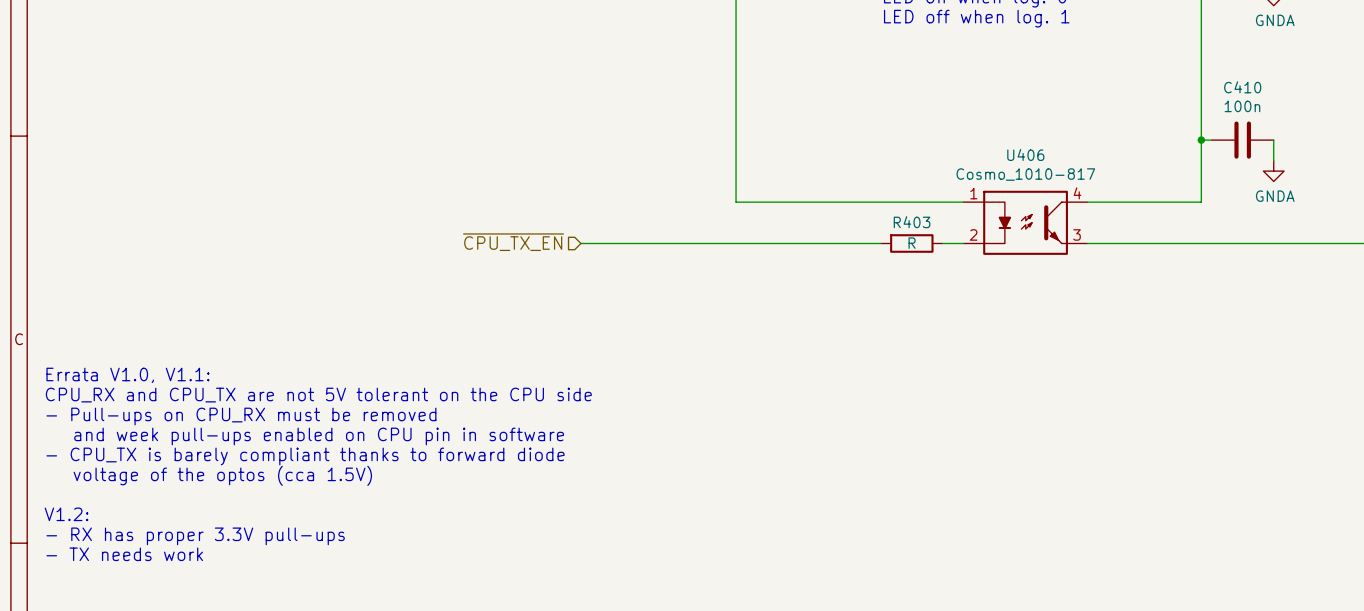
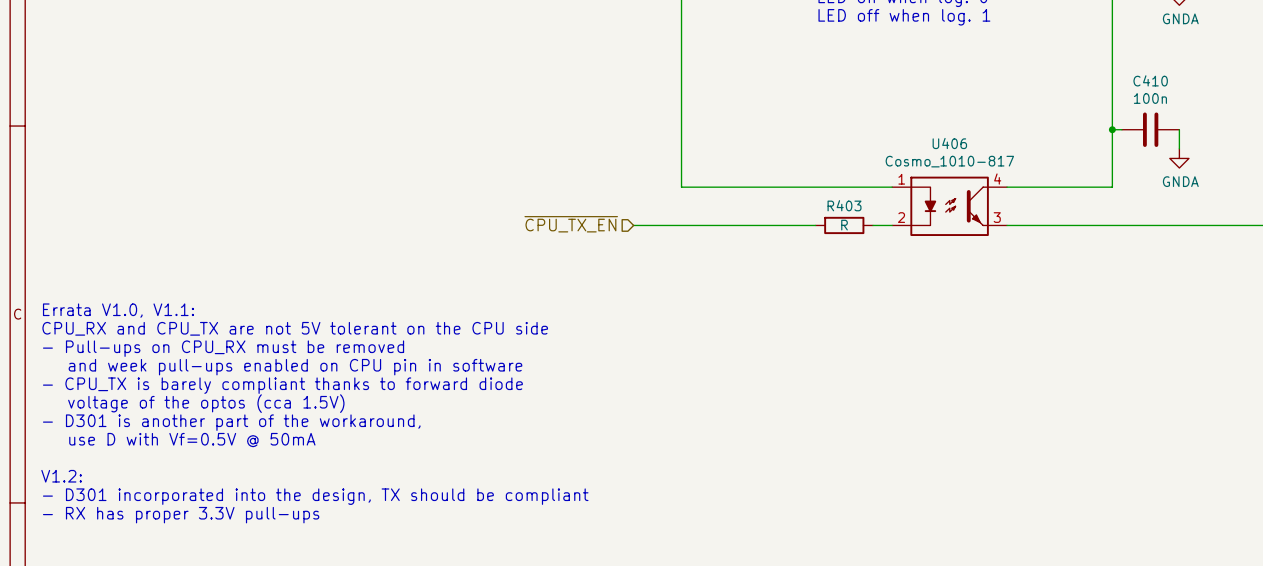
hierarchical label position: ~{CPU_TX_EN} (513, 242) -> ~{CPU_TX_EN} (571, 224)
wire: (580, 243) (684, 243) -> none
text: none -> Errata V1.0, V1.1: (118, 310)
text: none -> CPU_RX and CPU_TX are not 5V tolerant on the CPU side (295, 328)
text: Errata V1.0, V1.1: (127, 375) -> - Pull-ups on CPU_RX must be removed (223, 348)
text: CPU_RX and CPU_TX are not 5V tolerant on the CPU side (318, 395) -> and week pull-ups enabled on CPU pin in software (295, 367)
text: - Pull-ups on CPU_RX must be removed (241, 416) -> - CPU_TX is barely compliant thanks to forward diode (282, 385)
text: and week pull-ups enabled on CPU pin in software (319, 436) -> voltage of the optos (cca 1.5V) (206, 403)
text: - CPU_TX is barely compliant thanks to forward diode (305, 456) -> - D301 is another part of the workaround, (231, 422)
text: voltage of the optos (cca 1.5V) (222, 475) -> use D with Vf=0.5V @ 50mA (192, 440)
text: - RX has proper 3.3V pull-ups (195, 536) -> - D301 incorporated into the design, TX should be compliant (315, 496)
text: - TX needs work (124, 554) -> - RX has proper 3.3V pull-ups (181, 515)

